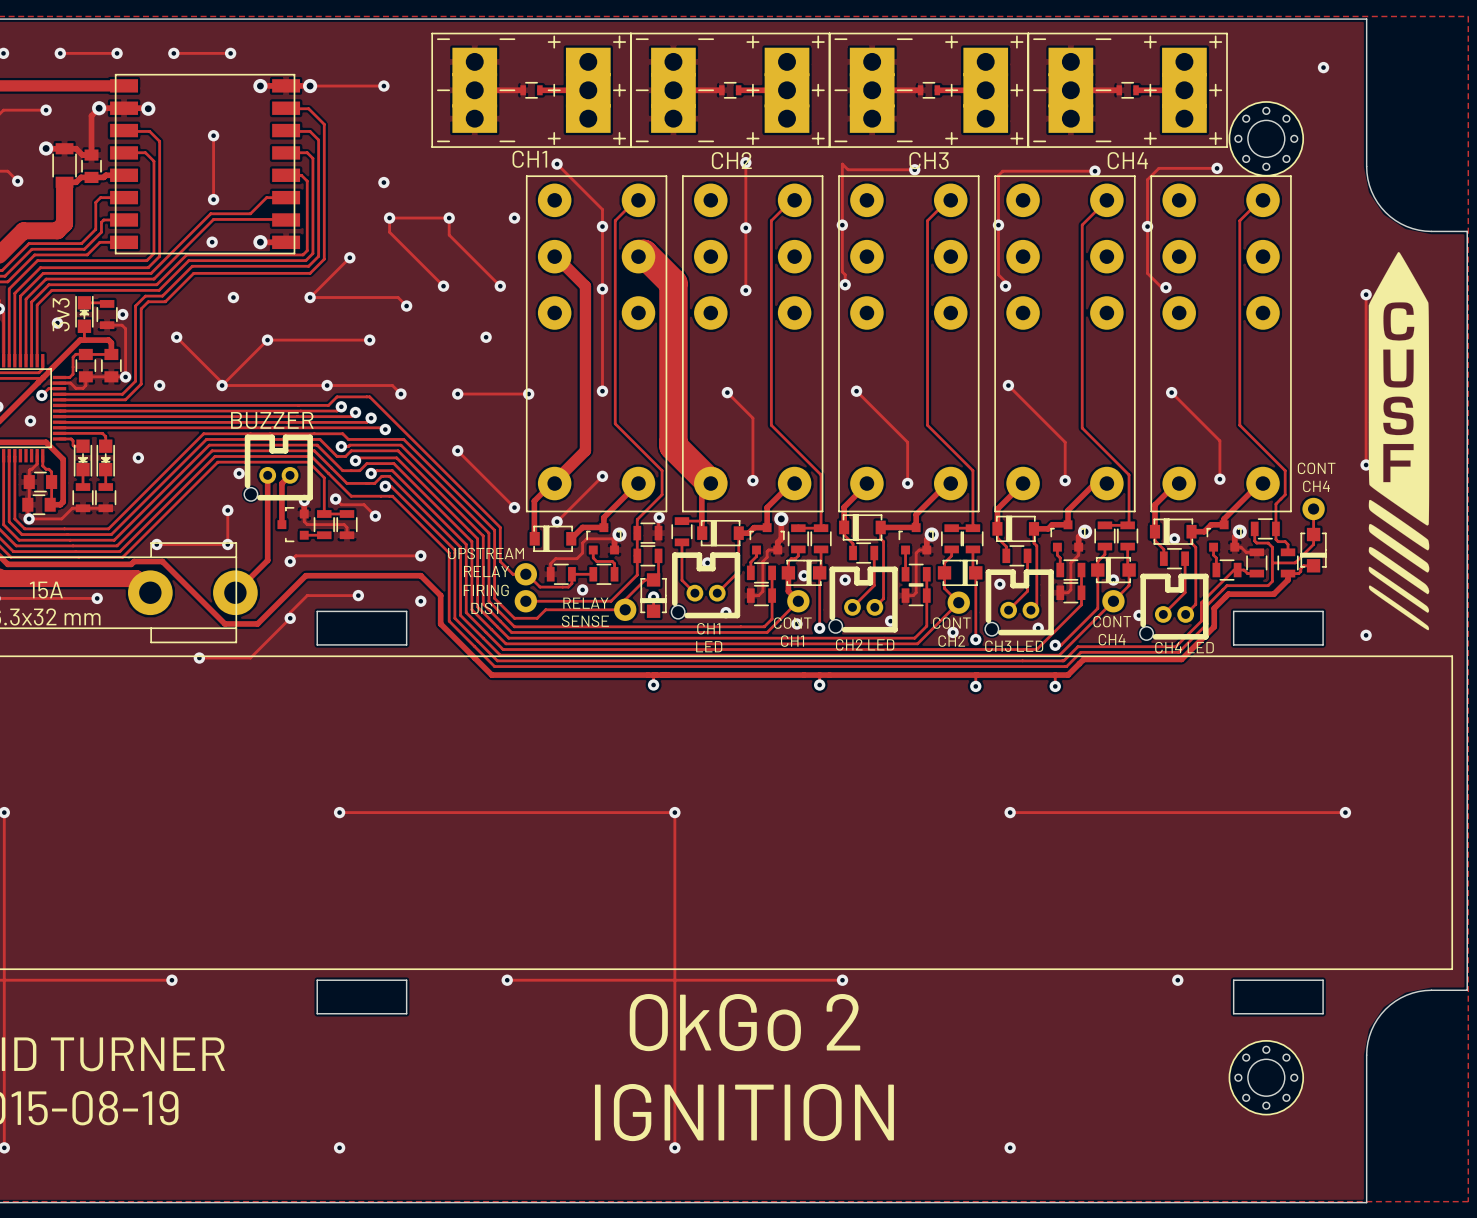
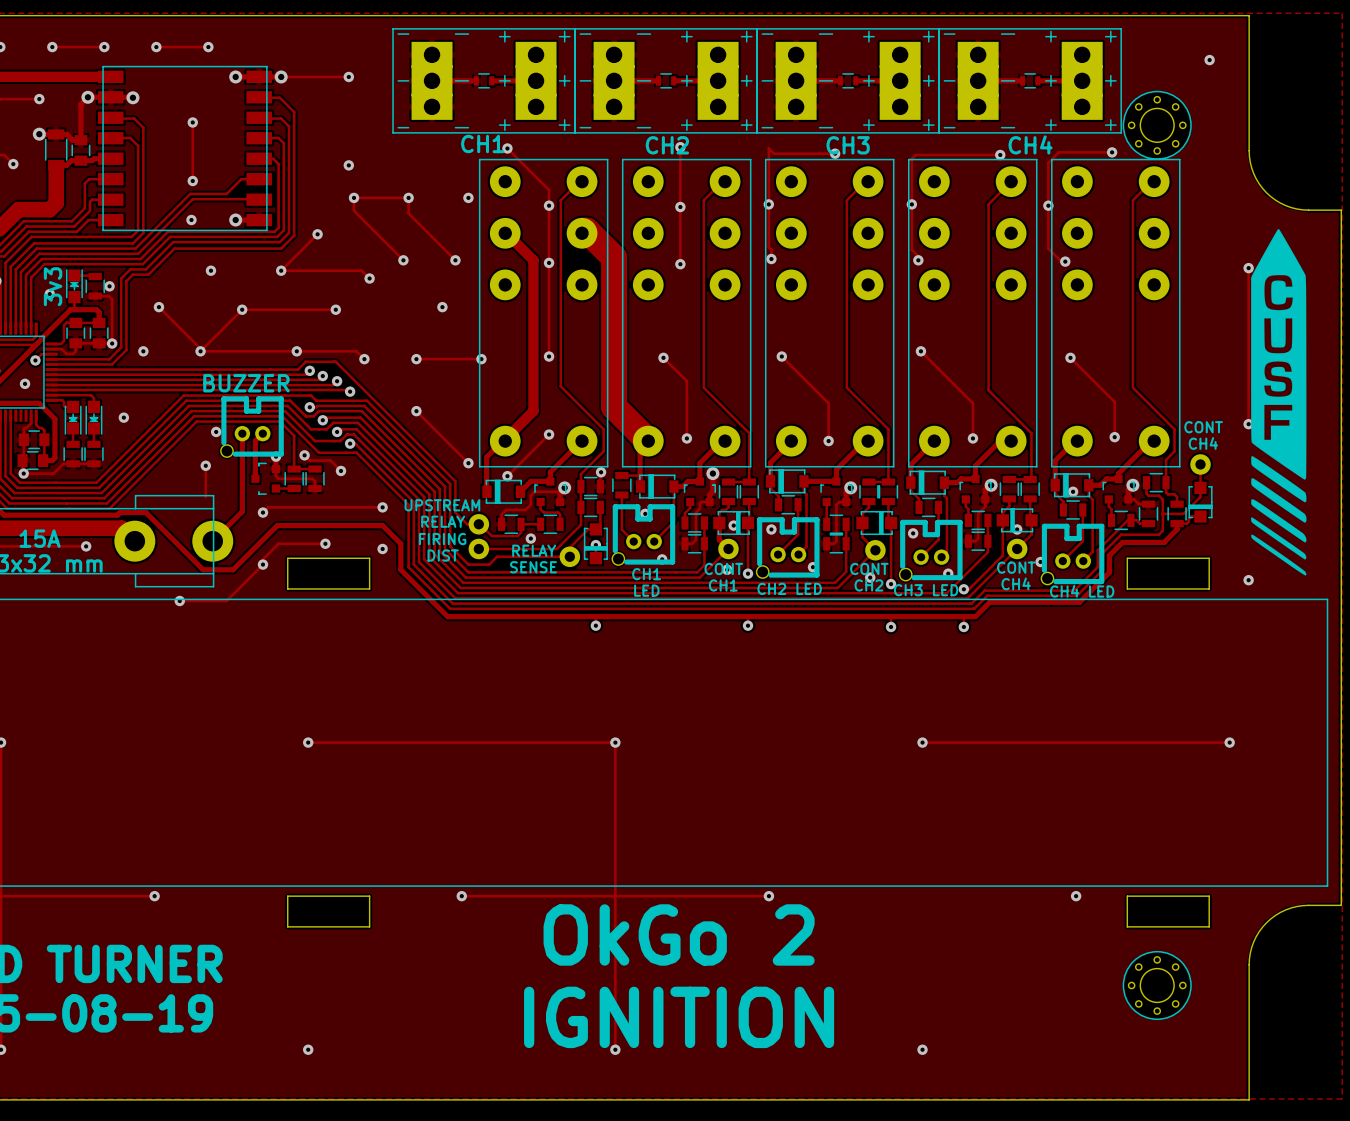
track: (156, 544) (227, 544) -> none
via: (156, 544) -> none
via: (227, 544) -> none

